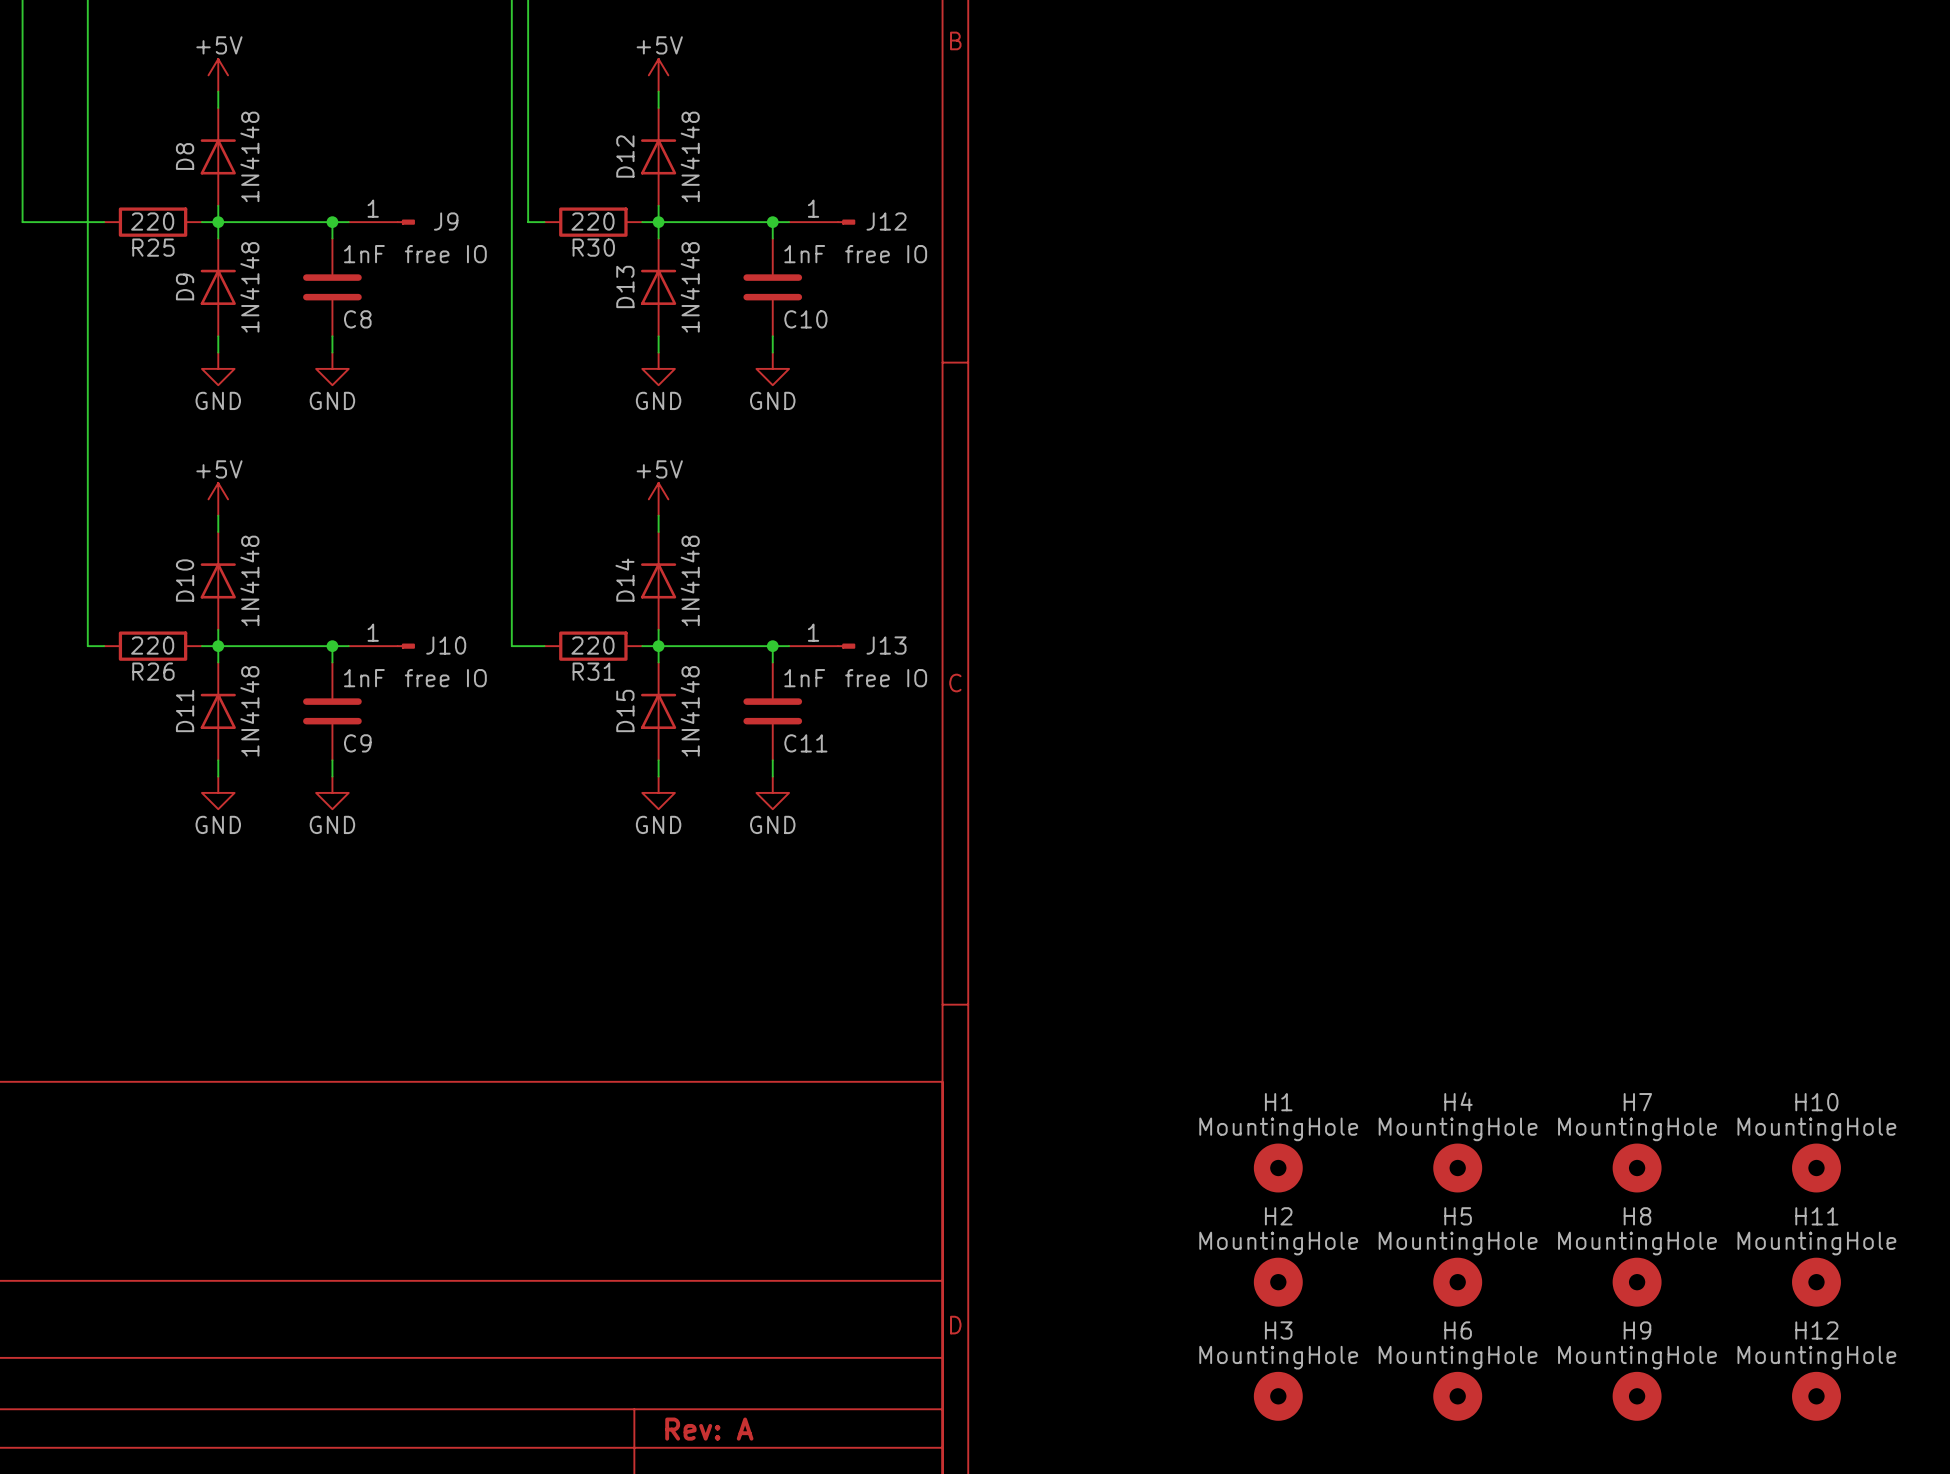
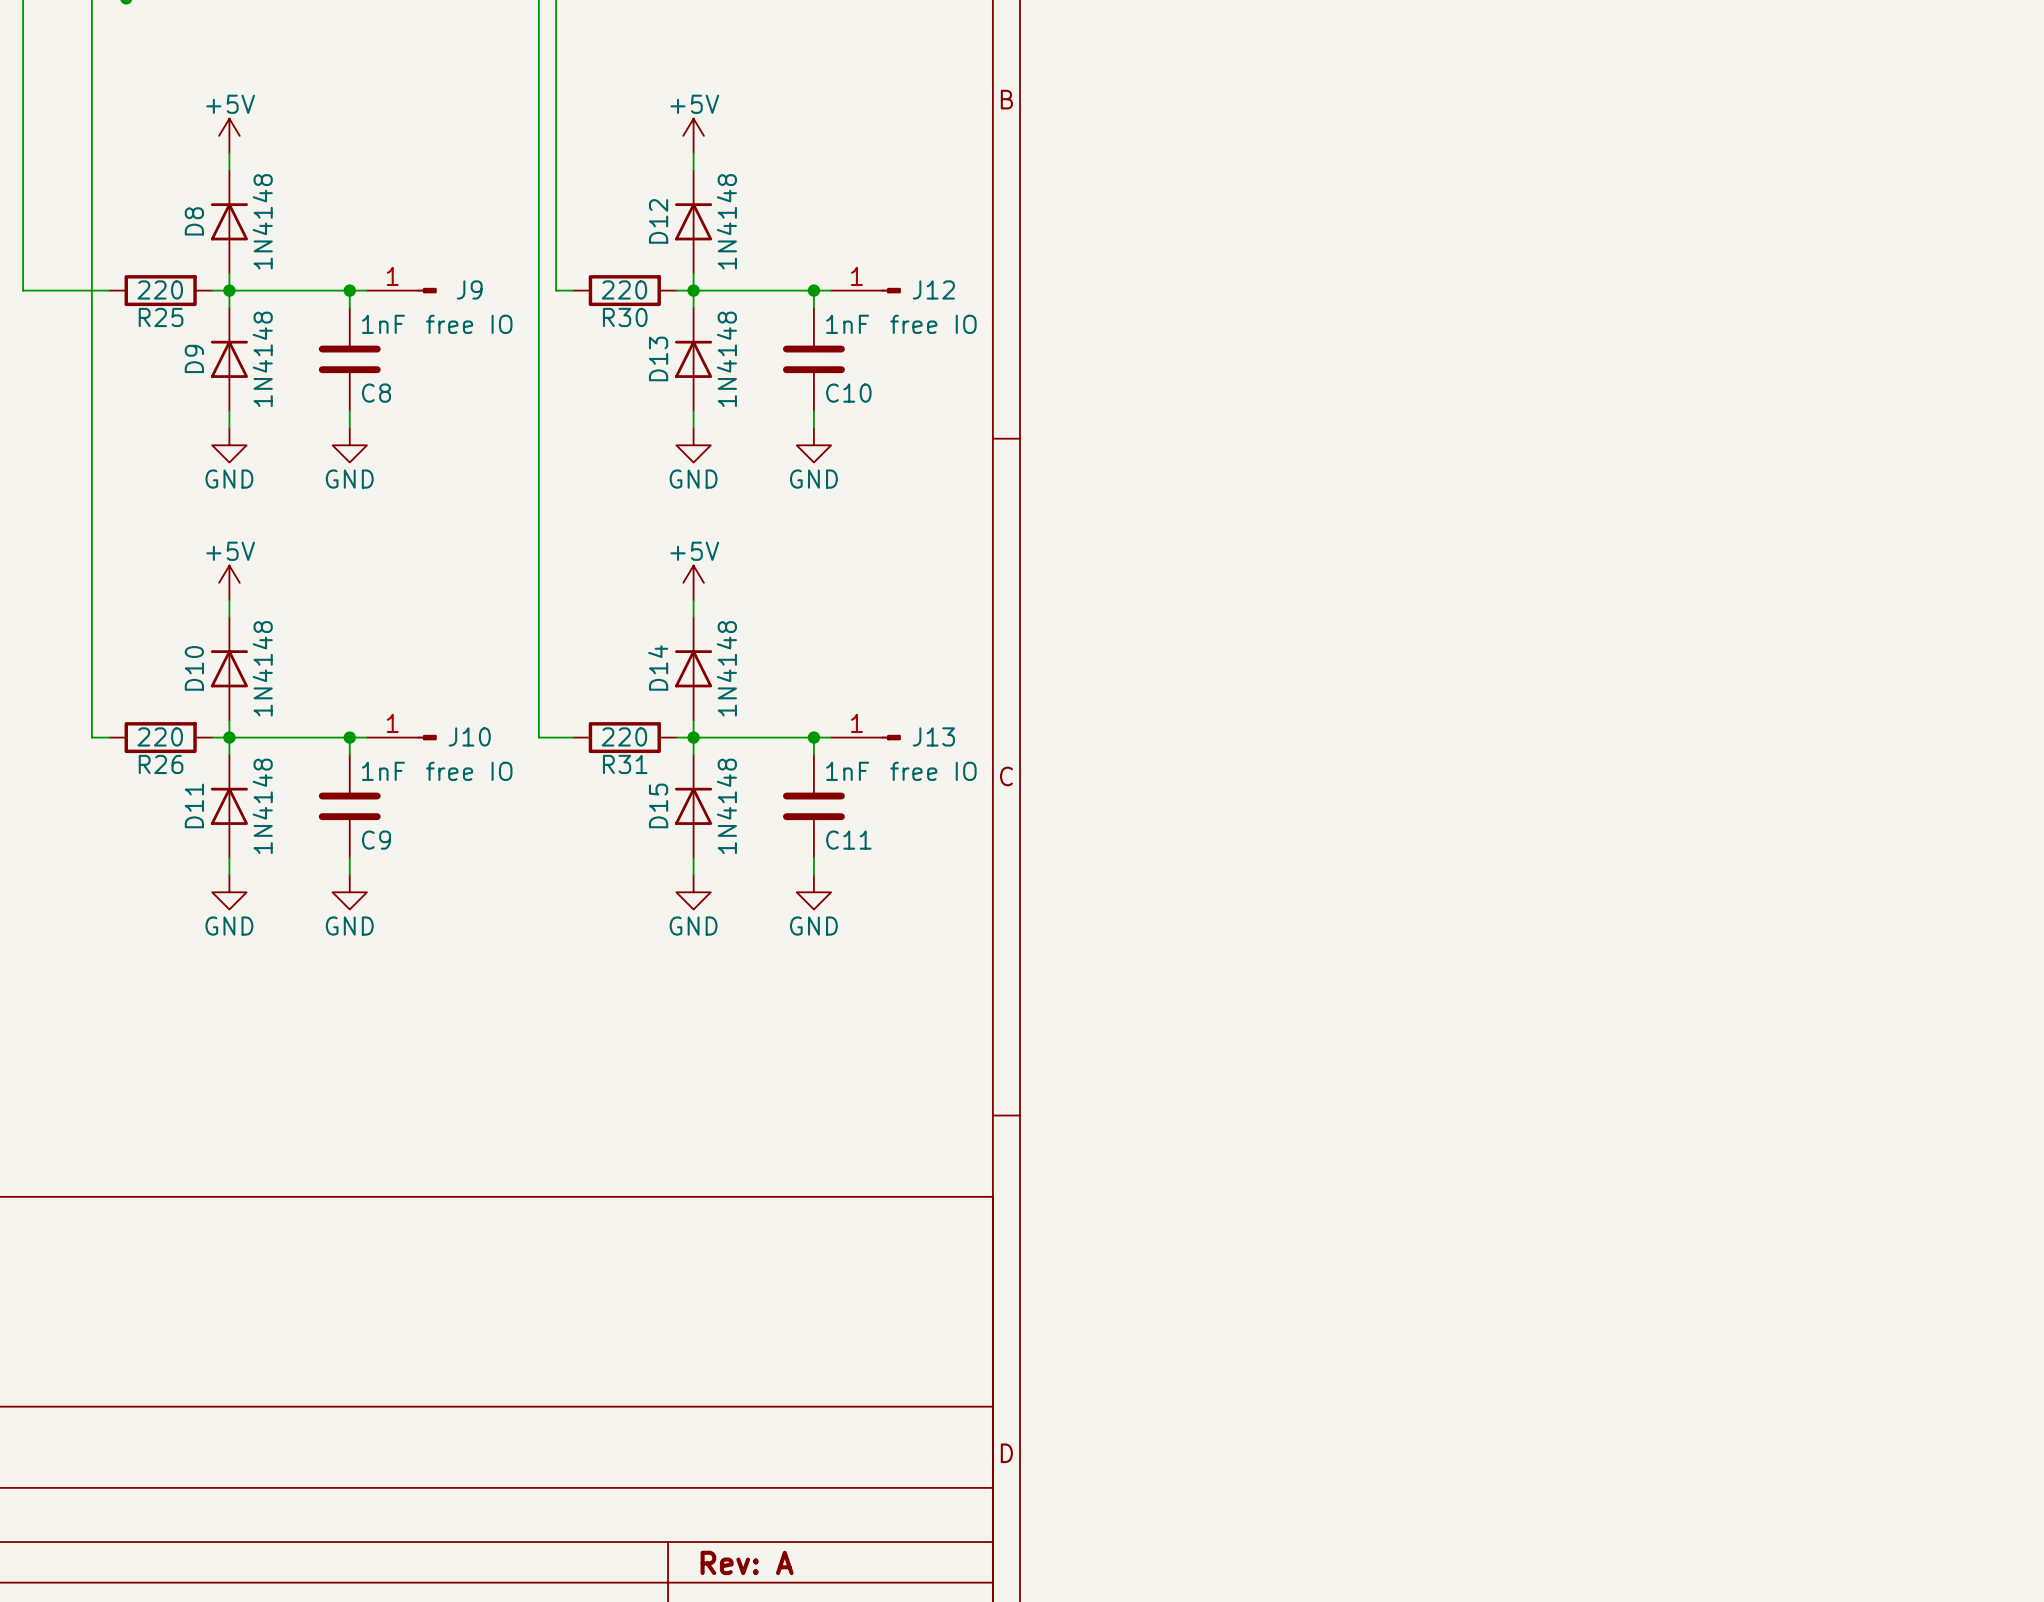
H1: MountingHole (1278, 1168) -> none
H4: MountingHole (1457, 1168) -> none
H7: MountingHole (1637, 1168) -> none
H10: MountingHole (1816, 1168) -> none
H2: MountingHole (1278, 1282) -> none
H5: MountingHole (1457, 1282) -> none
H8: MountingHole (1637, 1282) -> none
H11: MountingHole (1816, 1282) -> none
H3: MountingHole (1278, 1396) -> none
H6: MountingHole (1457, 1396) -> none
H9: MountingHole (1637, 1396) -> none
H12: MountingHole (1816, 1396) -> none

